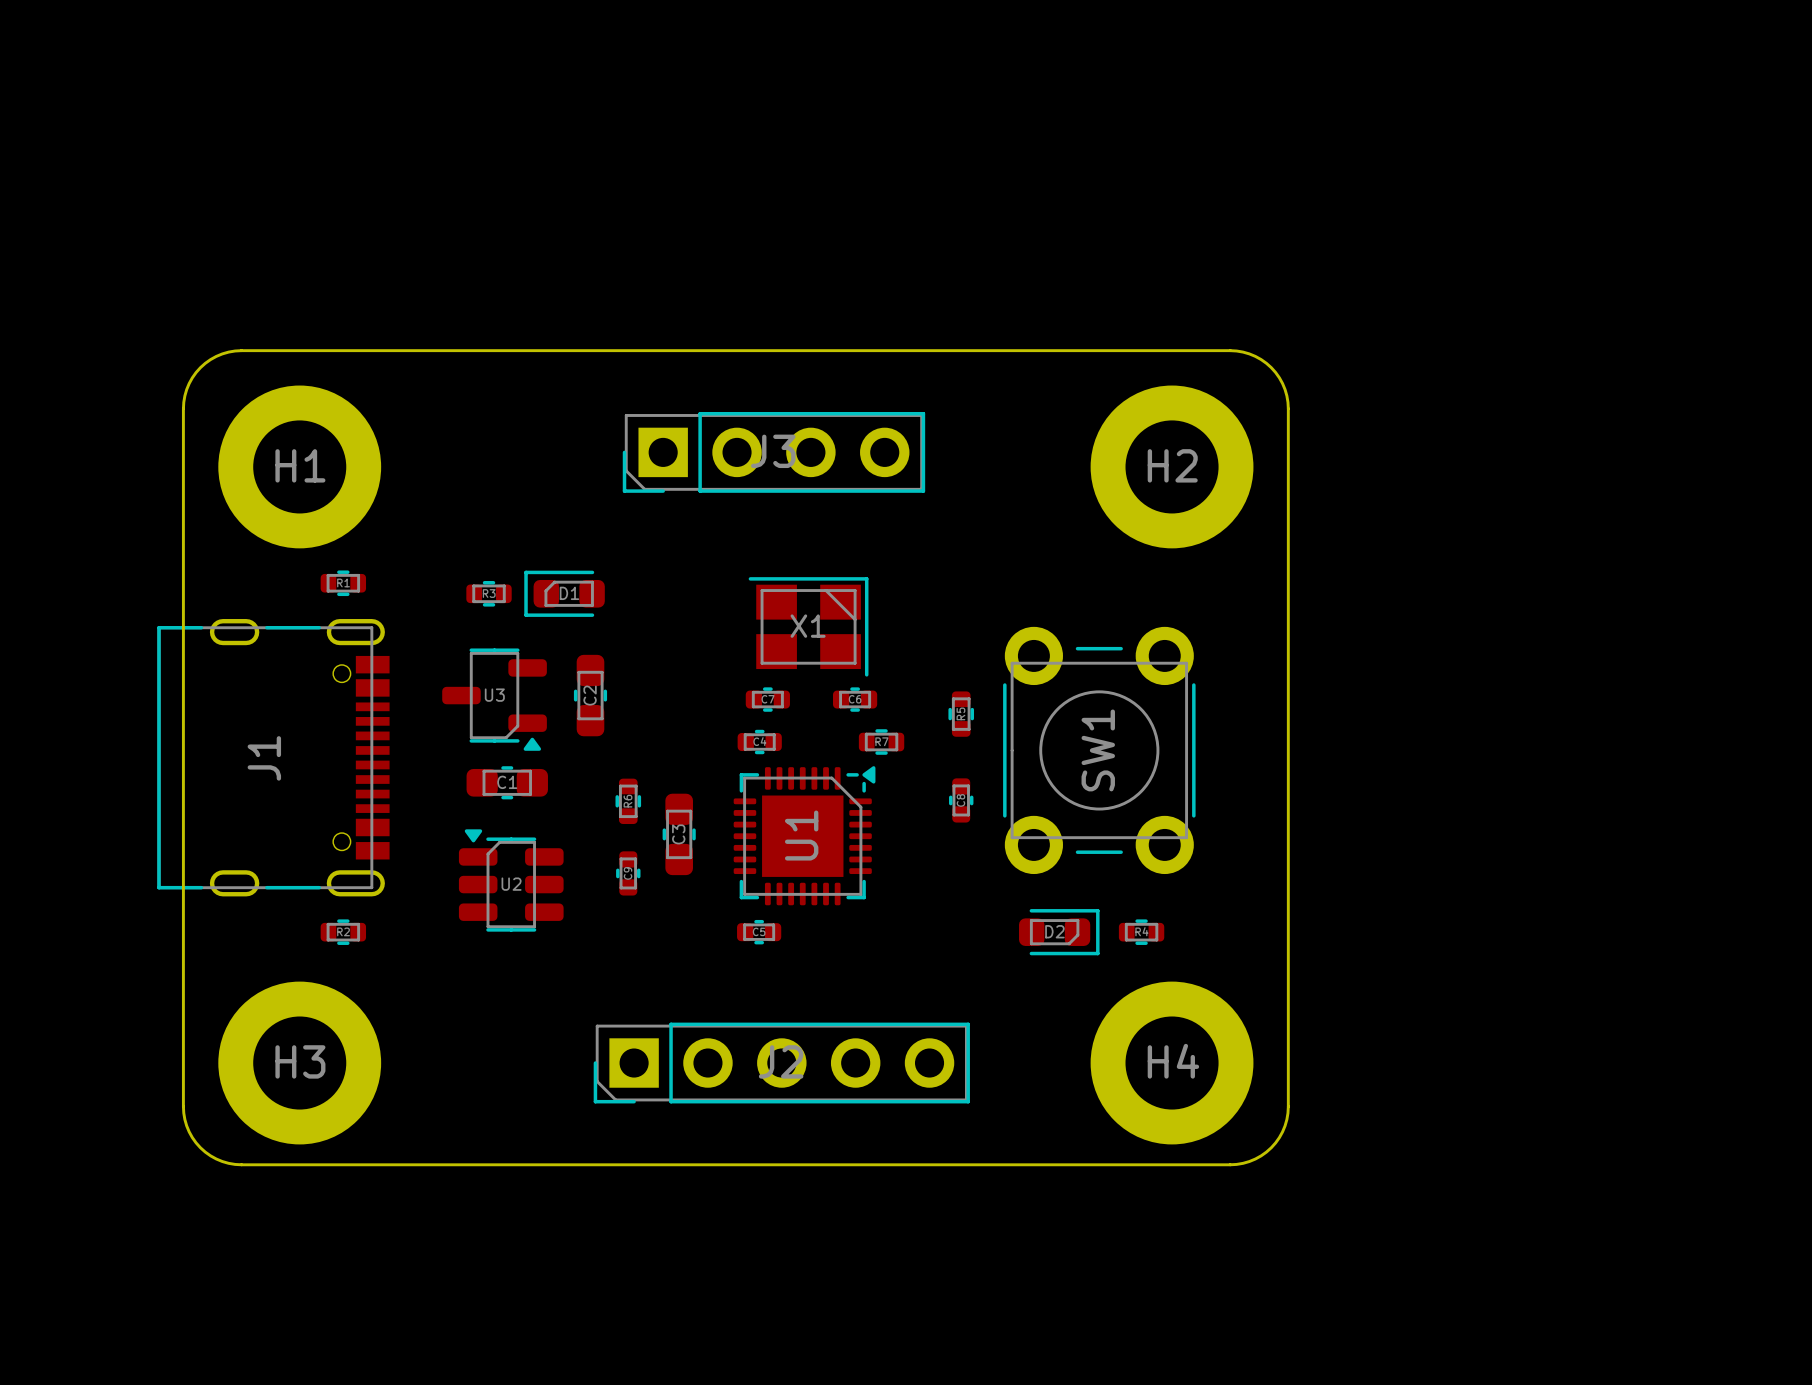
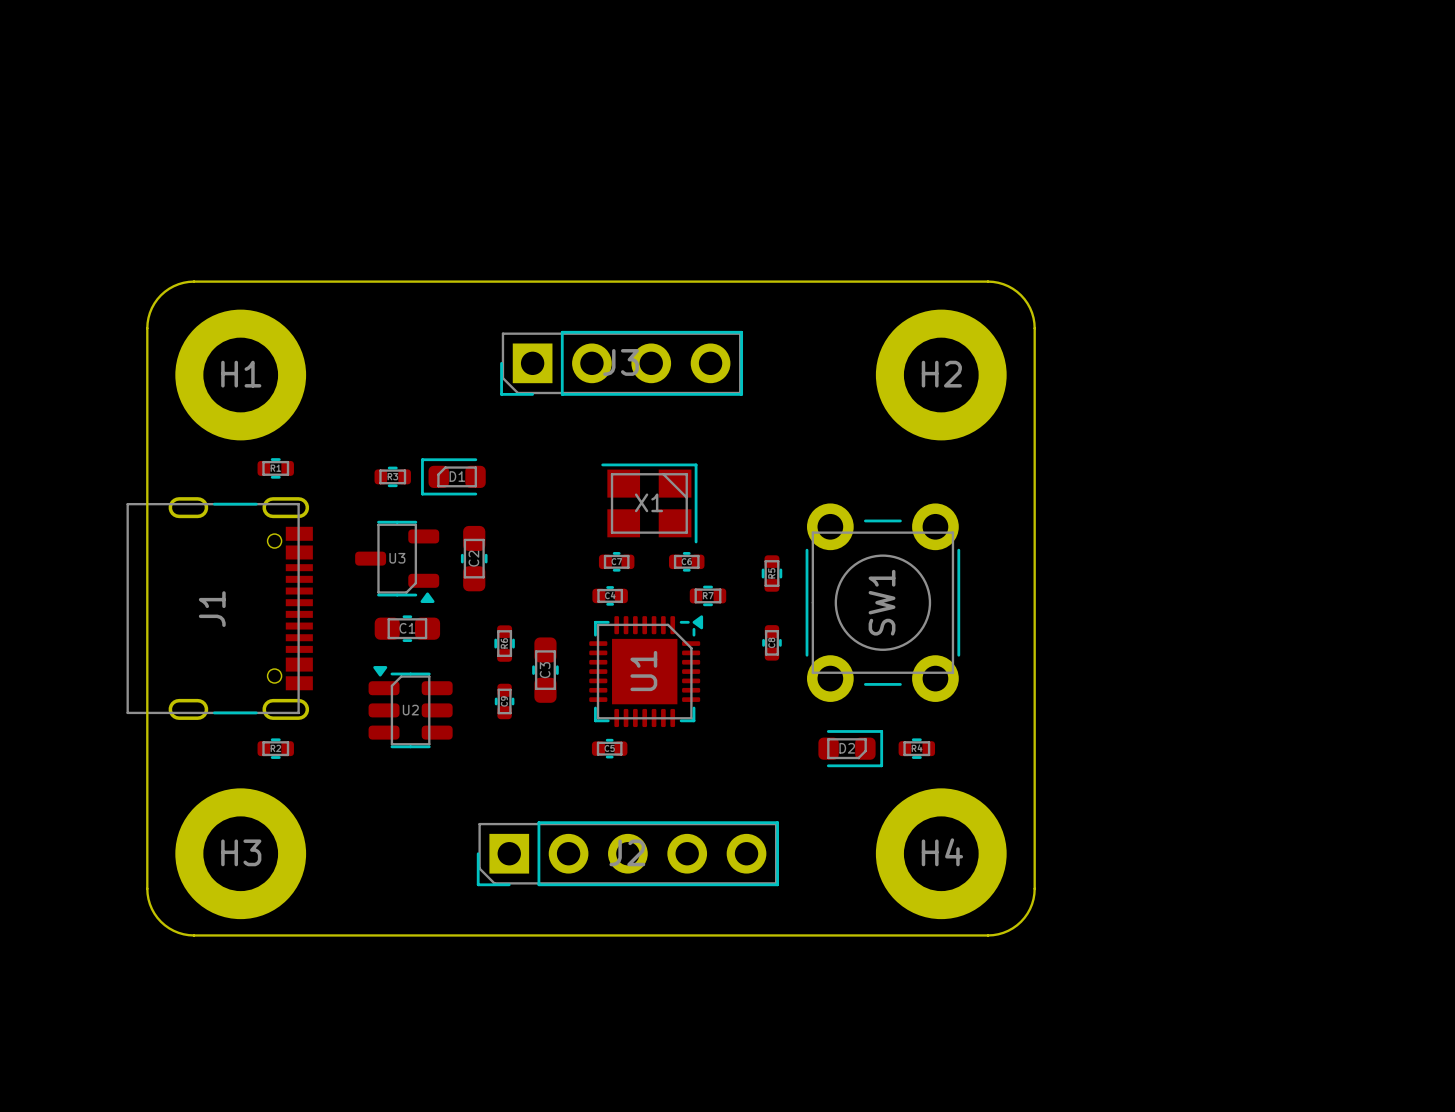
J1 footprint: [157, 619, 390, 897] -> [126, 497, 313, 720]

